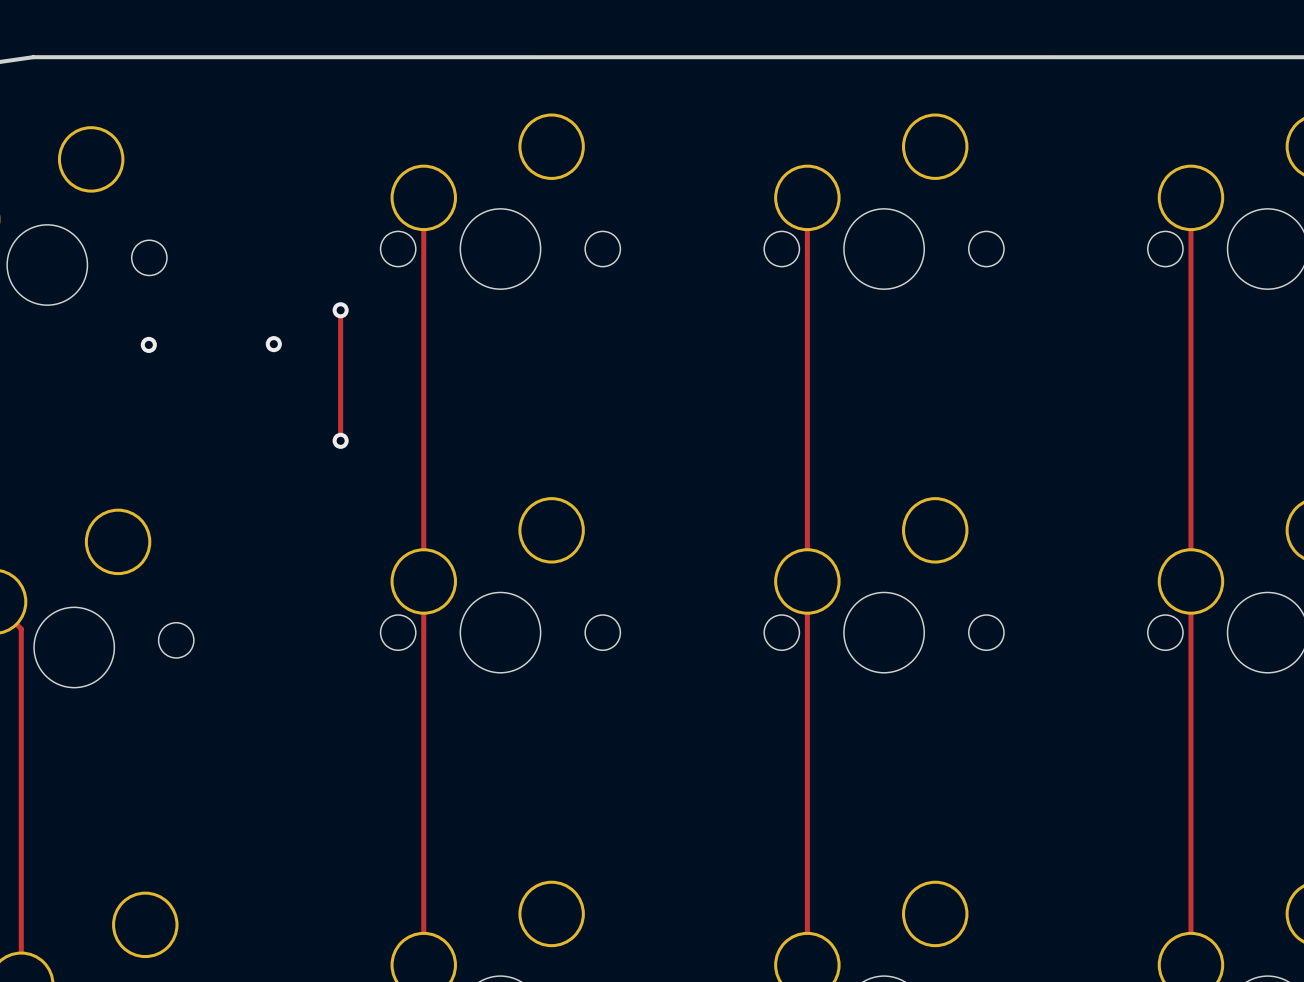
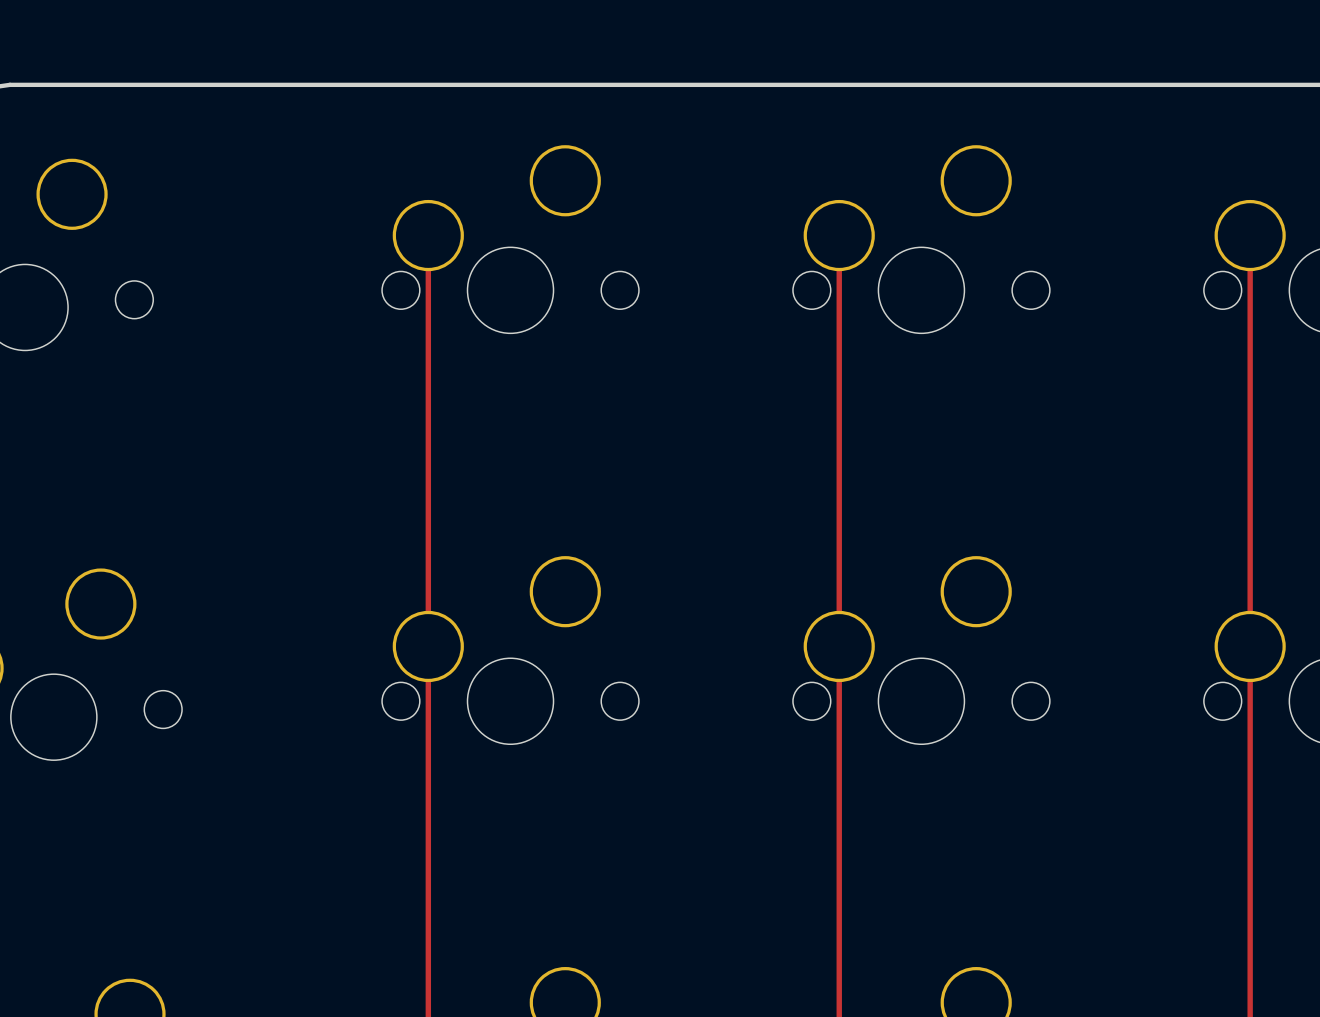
track: (340, 310) (340, 440) -> none
via: (340, 310) -> none
via: (148, 344) -> none
via: (273, 344) -> none
via: (340, 440) -> none

